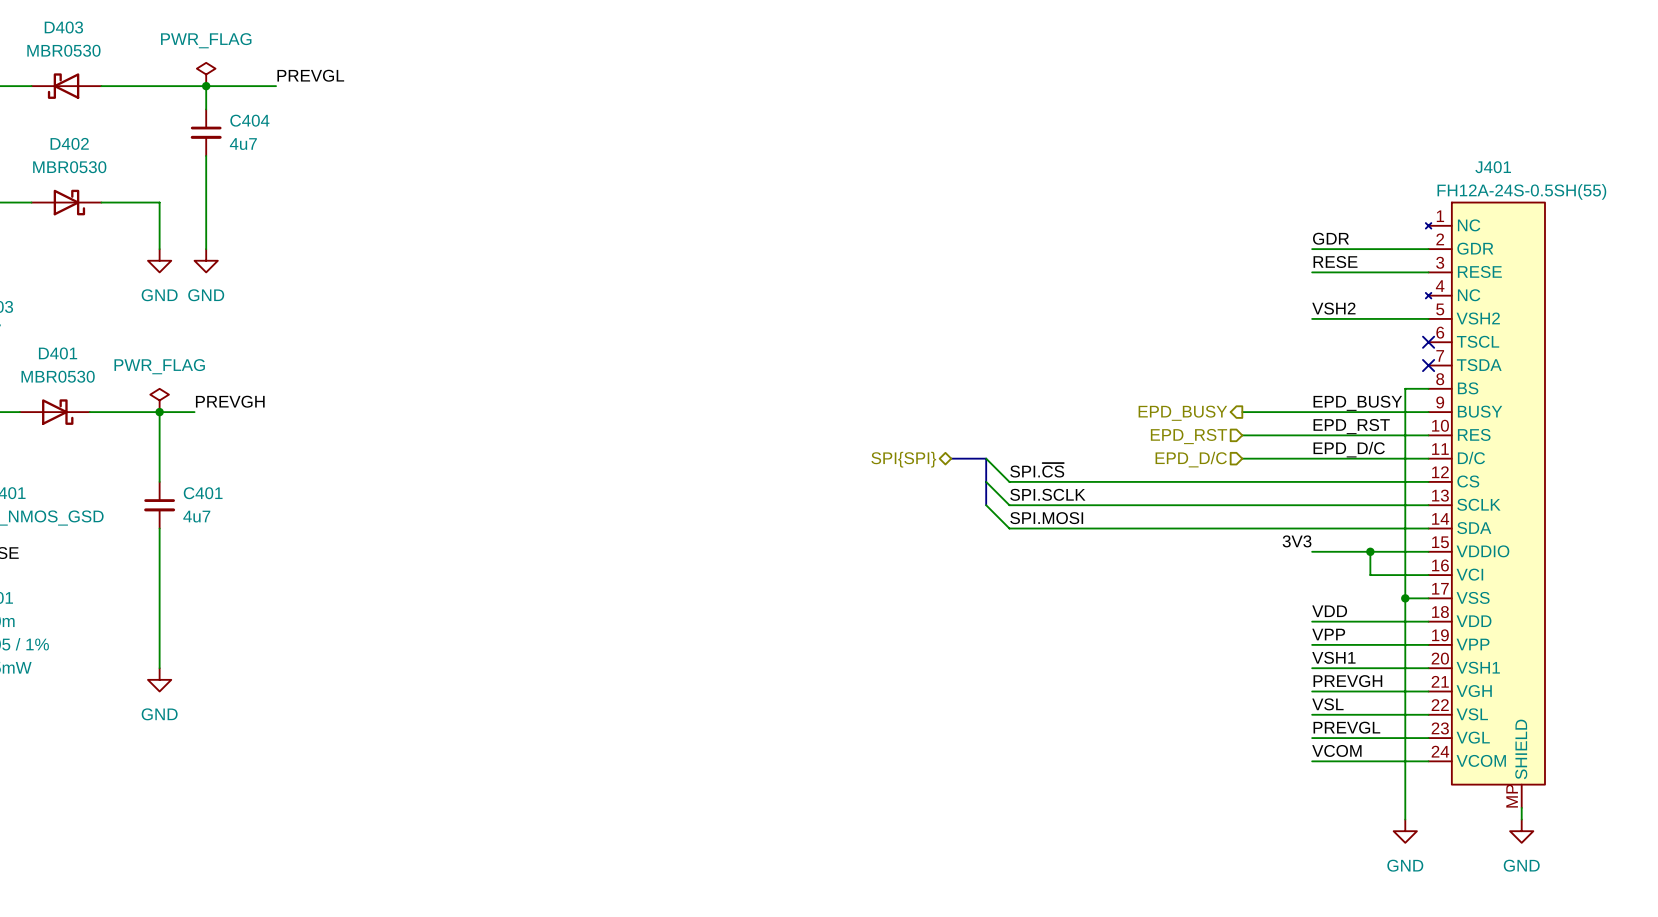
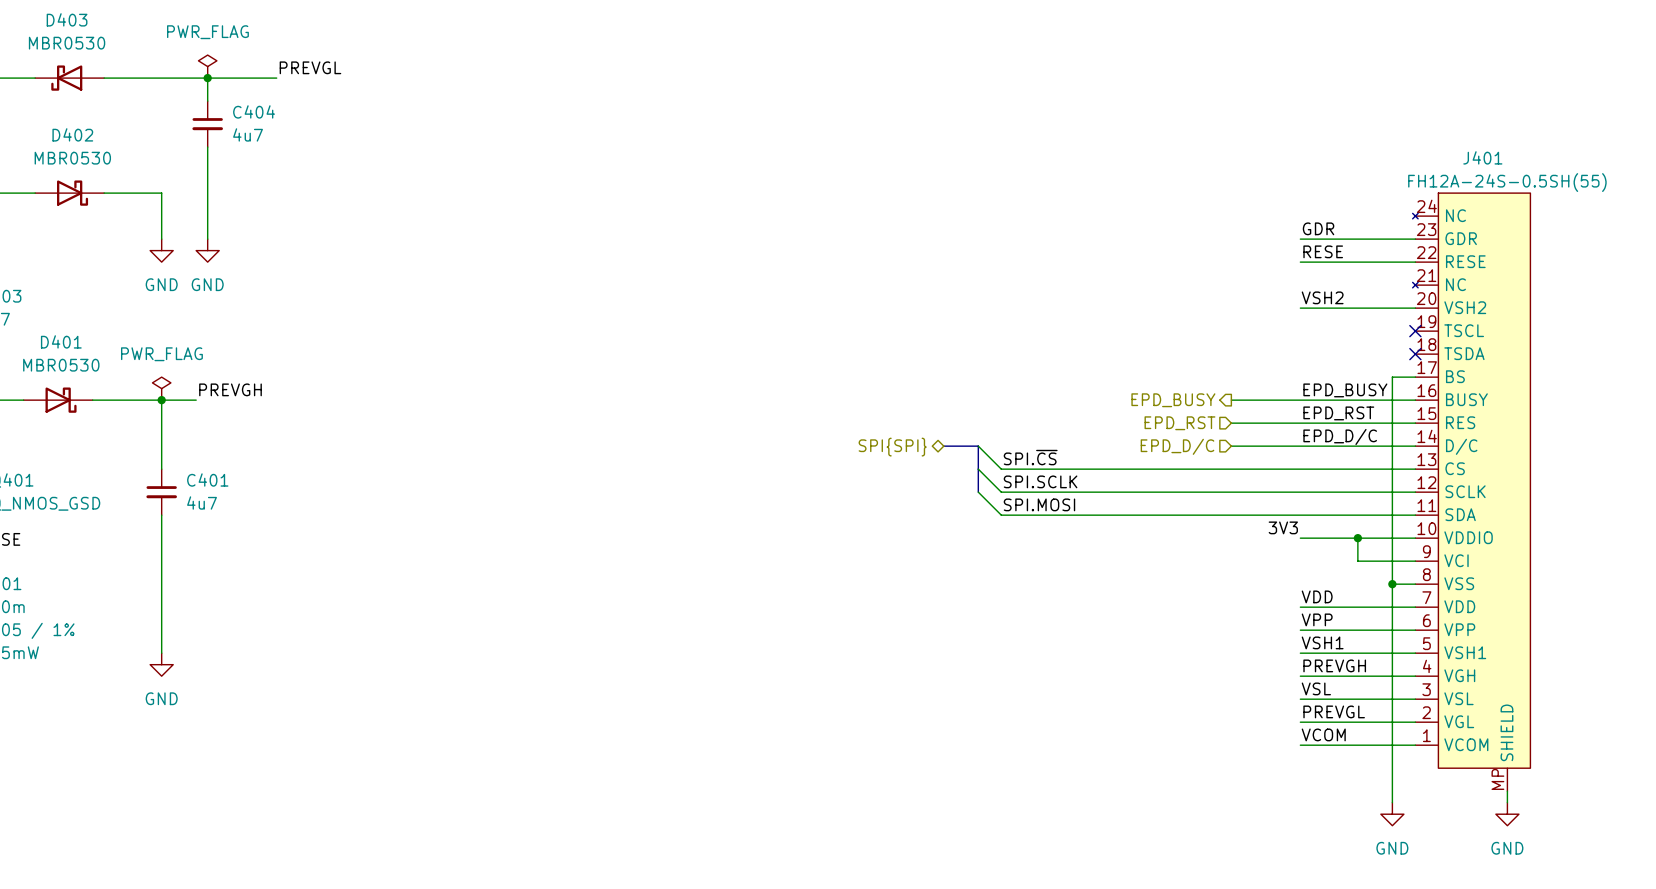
J401 symbol: [1425, 202, 1545, 808] -> [1412, 193, 1531, 792]

